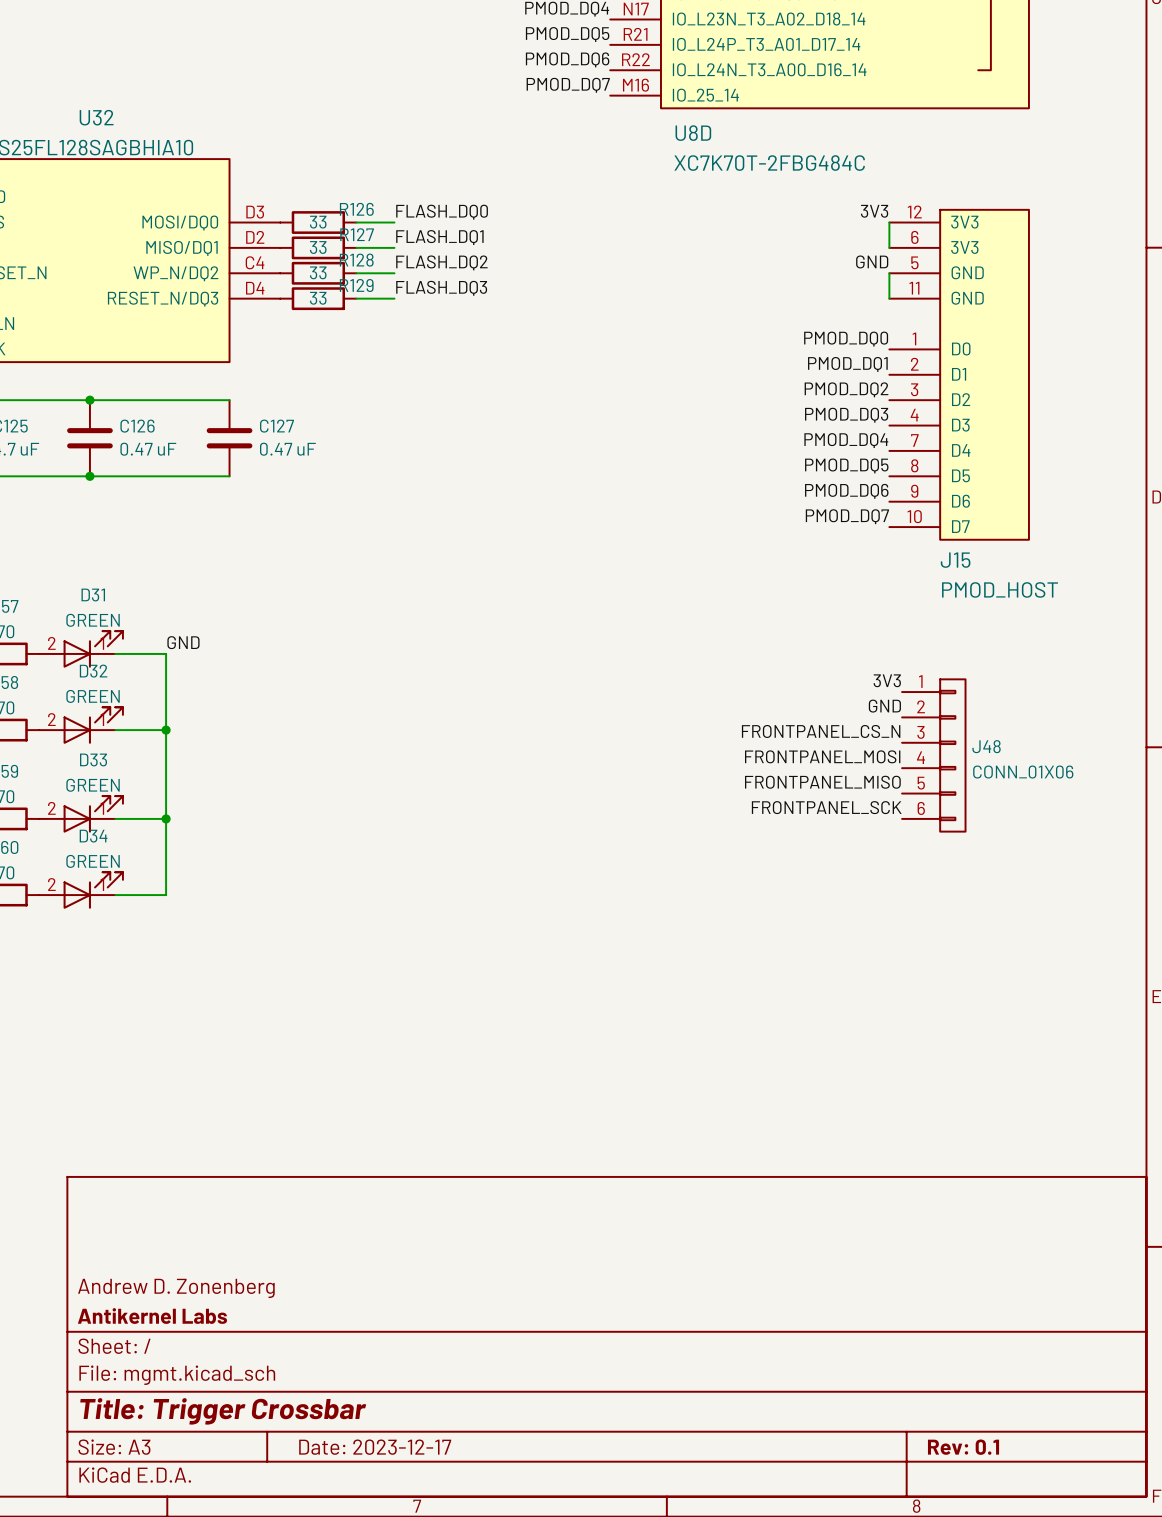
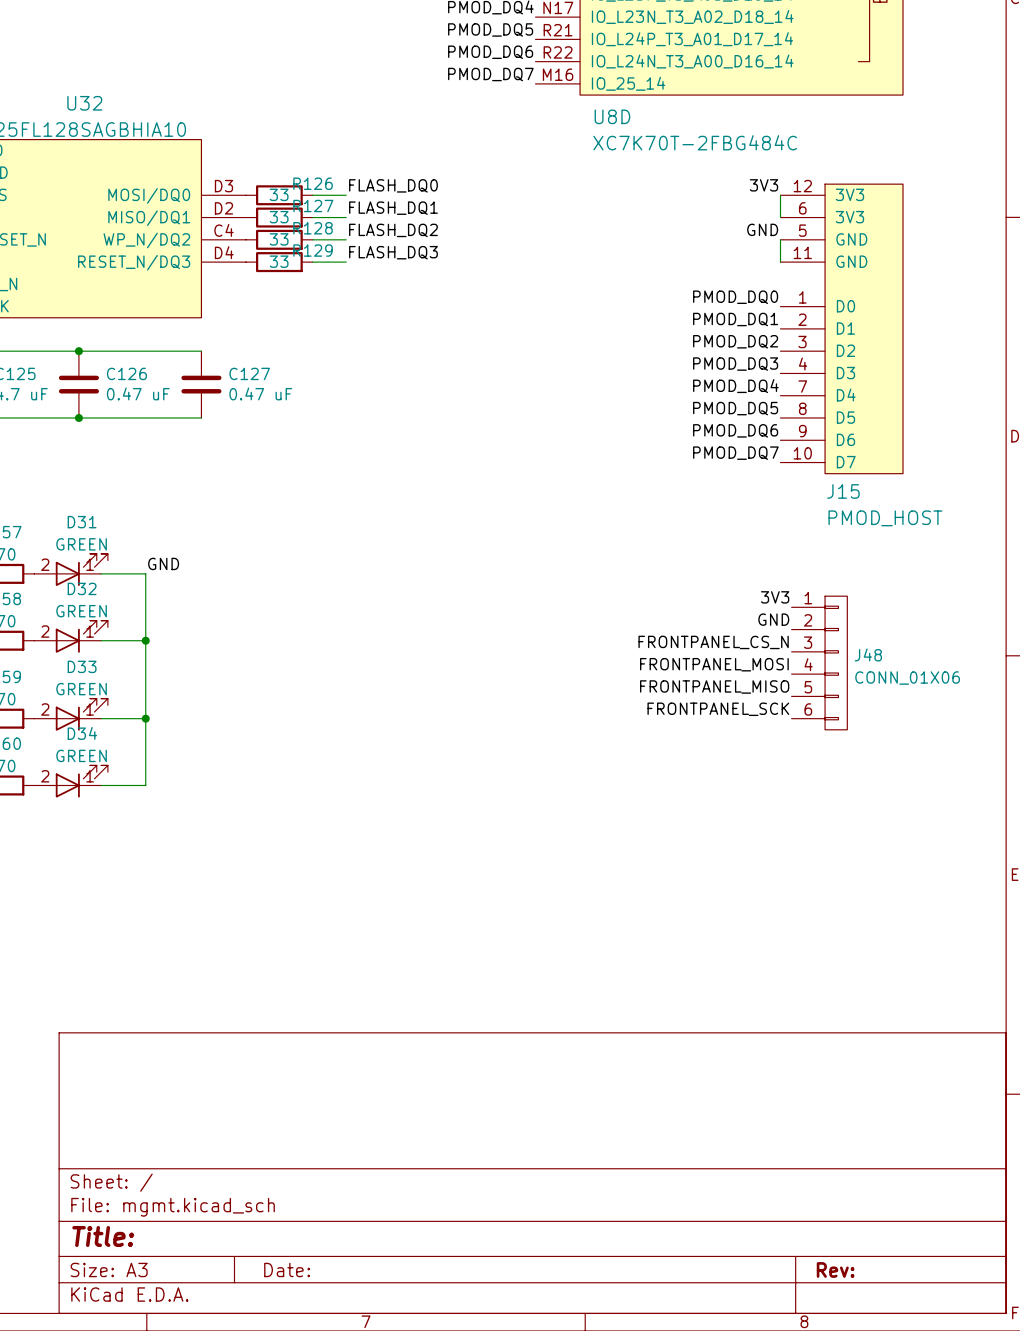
title block: Andrew D. Zonenberg (176, 1288) -> none
title block: Antikernel Labs (152, 1316) -> none
title block: Title: Trigger Crossbar (223, 1411) -> Title: (103, 1236)
title block: Date: 2023-12-17 (375, 1447) -> Date: (287, 1269)
title block: Rev: 0.1 (963, 1447) -> Rev: (835, 1269)

